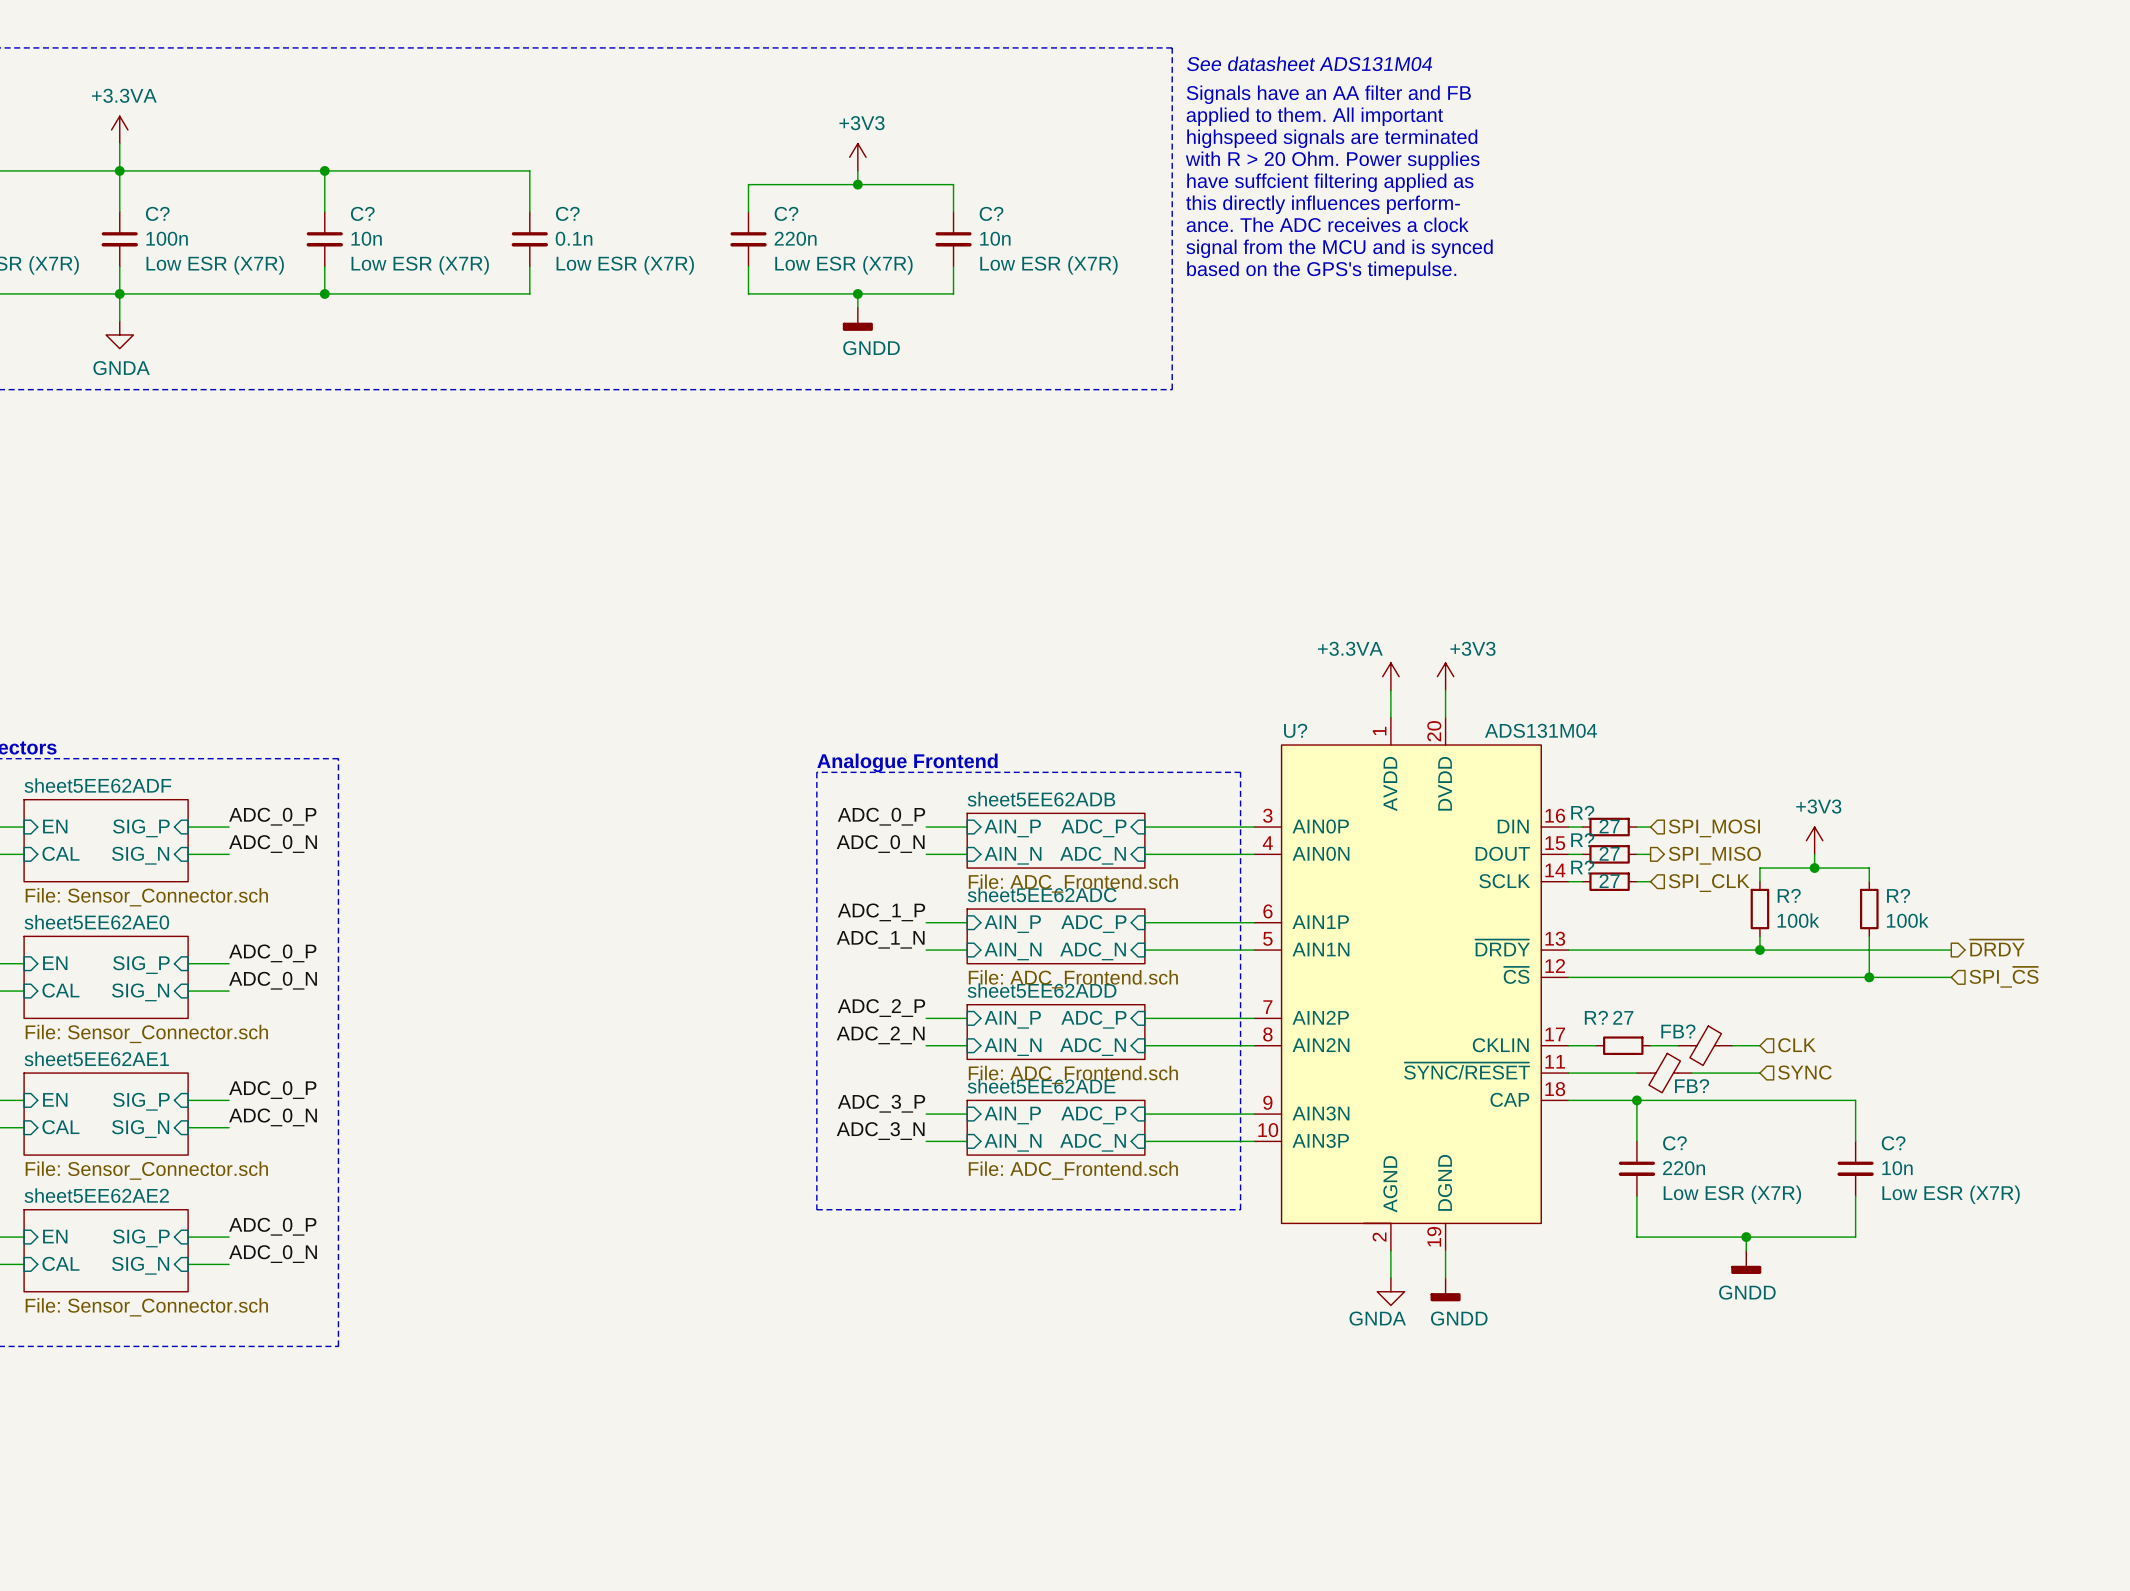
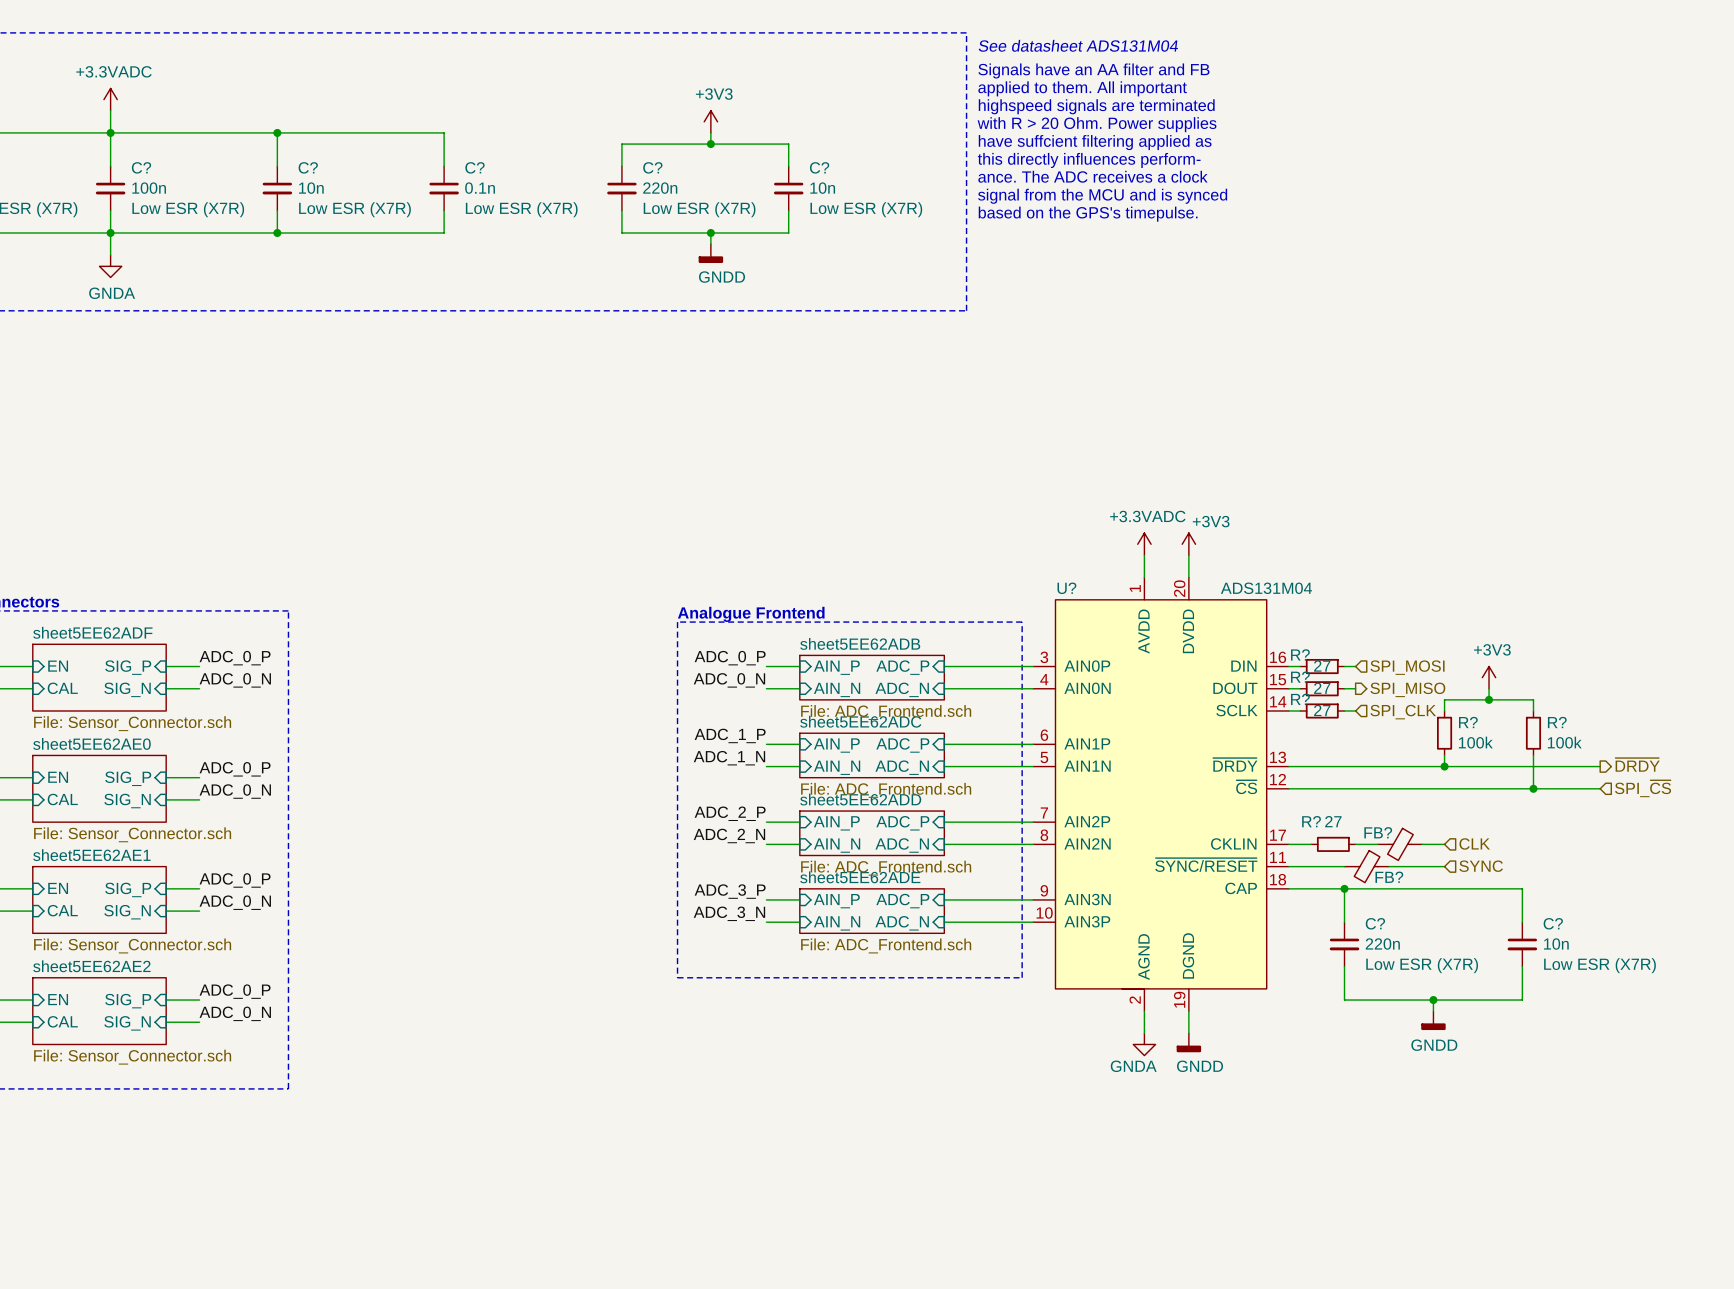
power symbol: +3.3VA (119, 129) -> +3.3VADC (110, 99)
power symbol: +3.3VA (1390, 676) -> +3.3VADC (1144, 544)

